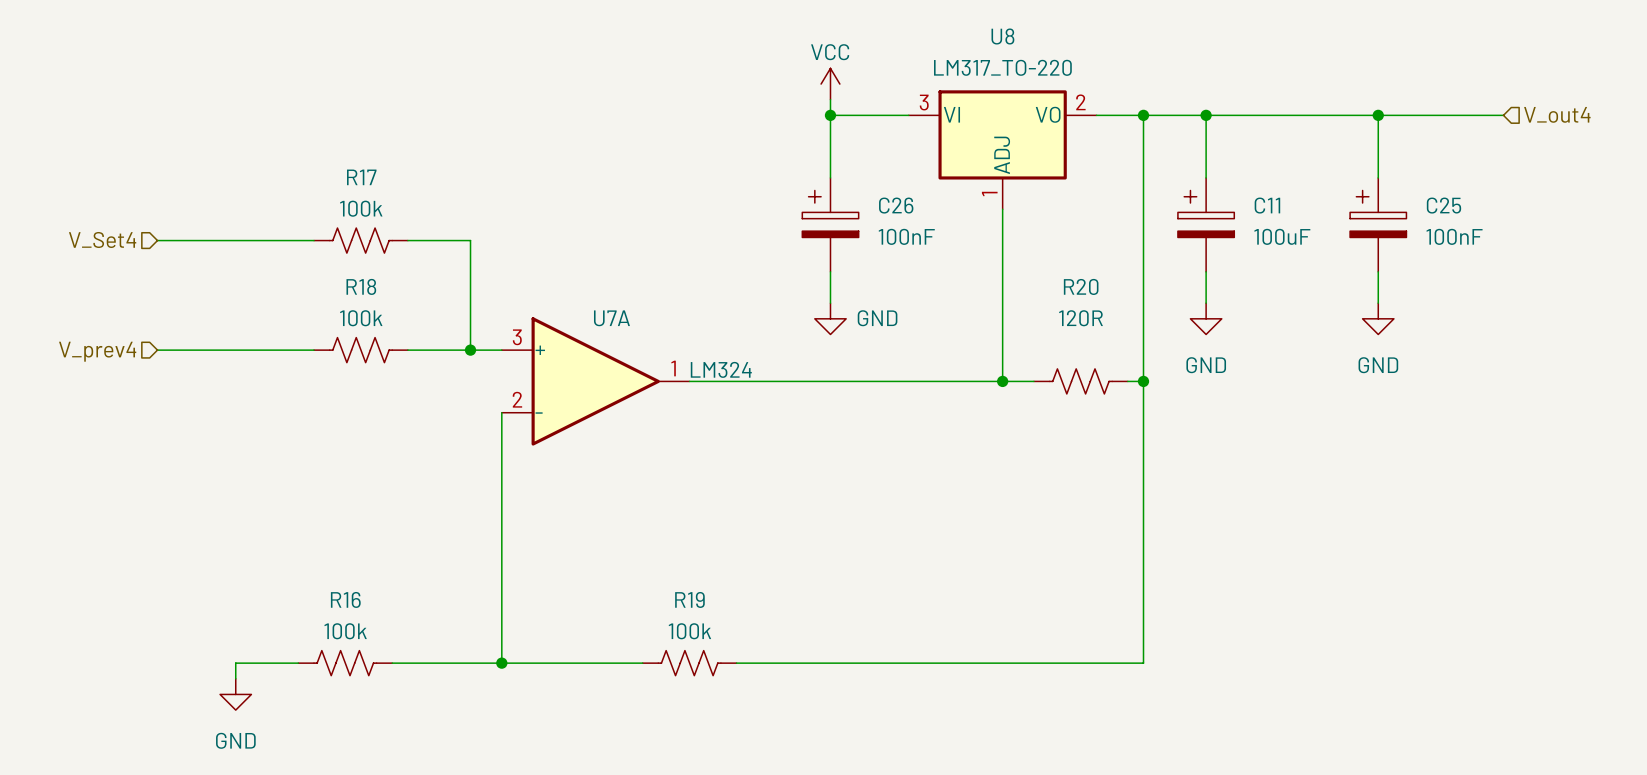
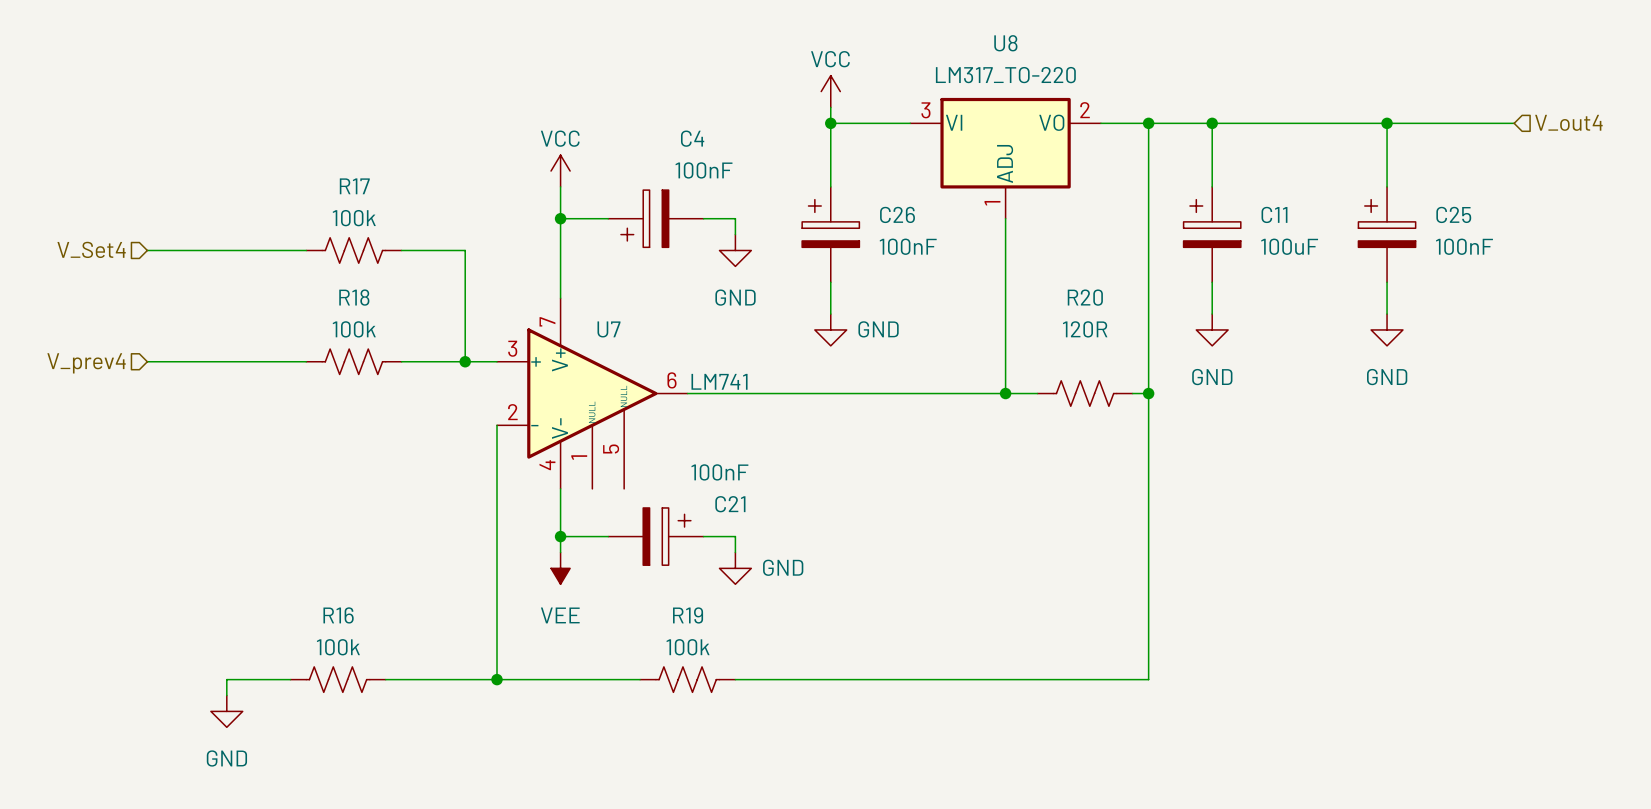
power symbol: none -> VCC (560, 171)
wire: none -> (560, 186) (560, 298)
wire: none -> (560, 218) (608, 218)
junction: none -> (560, 218)
C4: none -> 100nF (655, 218)
wire: none -> (703, 218) (735, 218) (735, 234)
power symbol: none -> GND (735, 250)
U7A: LM324 (595, 381) -> none
U7: none -> LM741 (592, 393)
wire: none -> (560, 488) (560, 552)
wire: none -> (560, 536) (608, 536)
junction: none -> (560, 536)
C21: none -> 100nF (655, 536)
wire: none -> (703, 536) (735, 536) (735, 552)
power symbol: none -> VEE (560, 568)
power symbol: none -> GND (735, 568)

